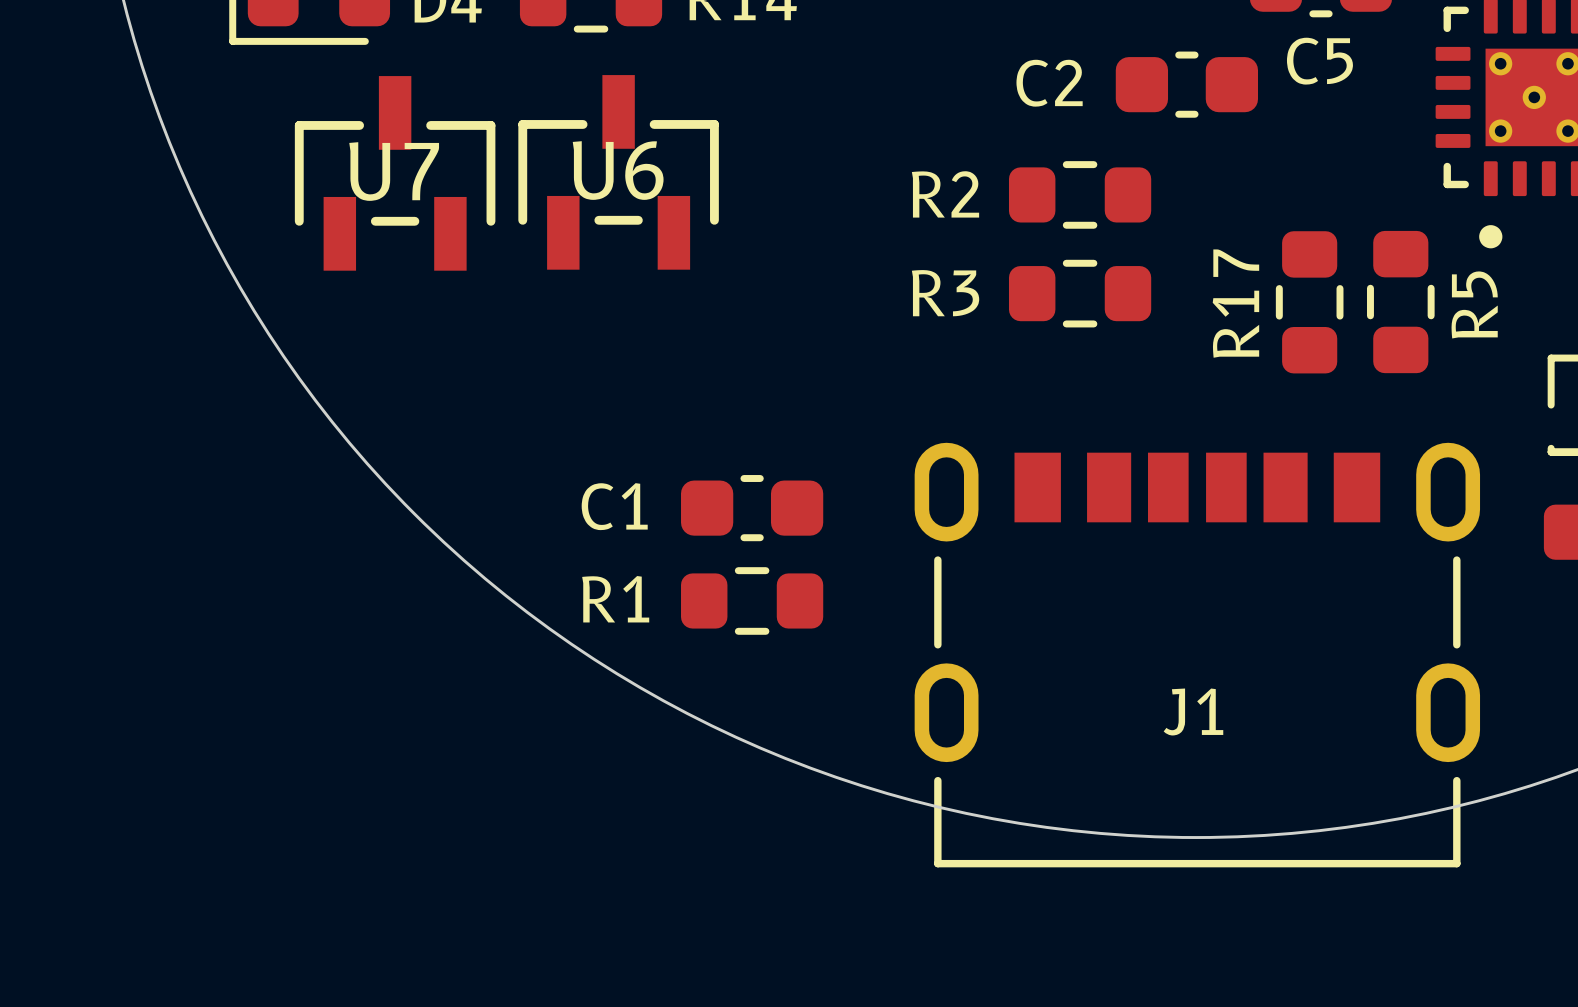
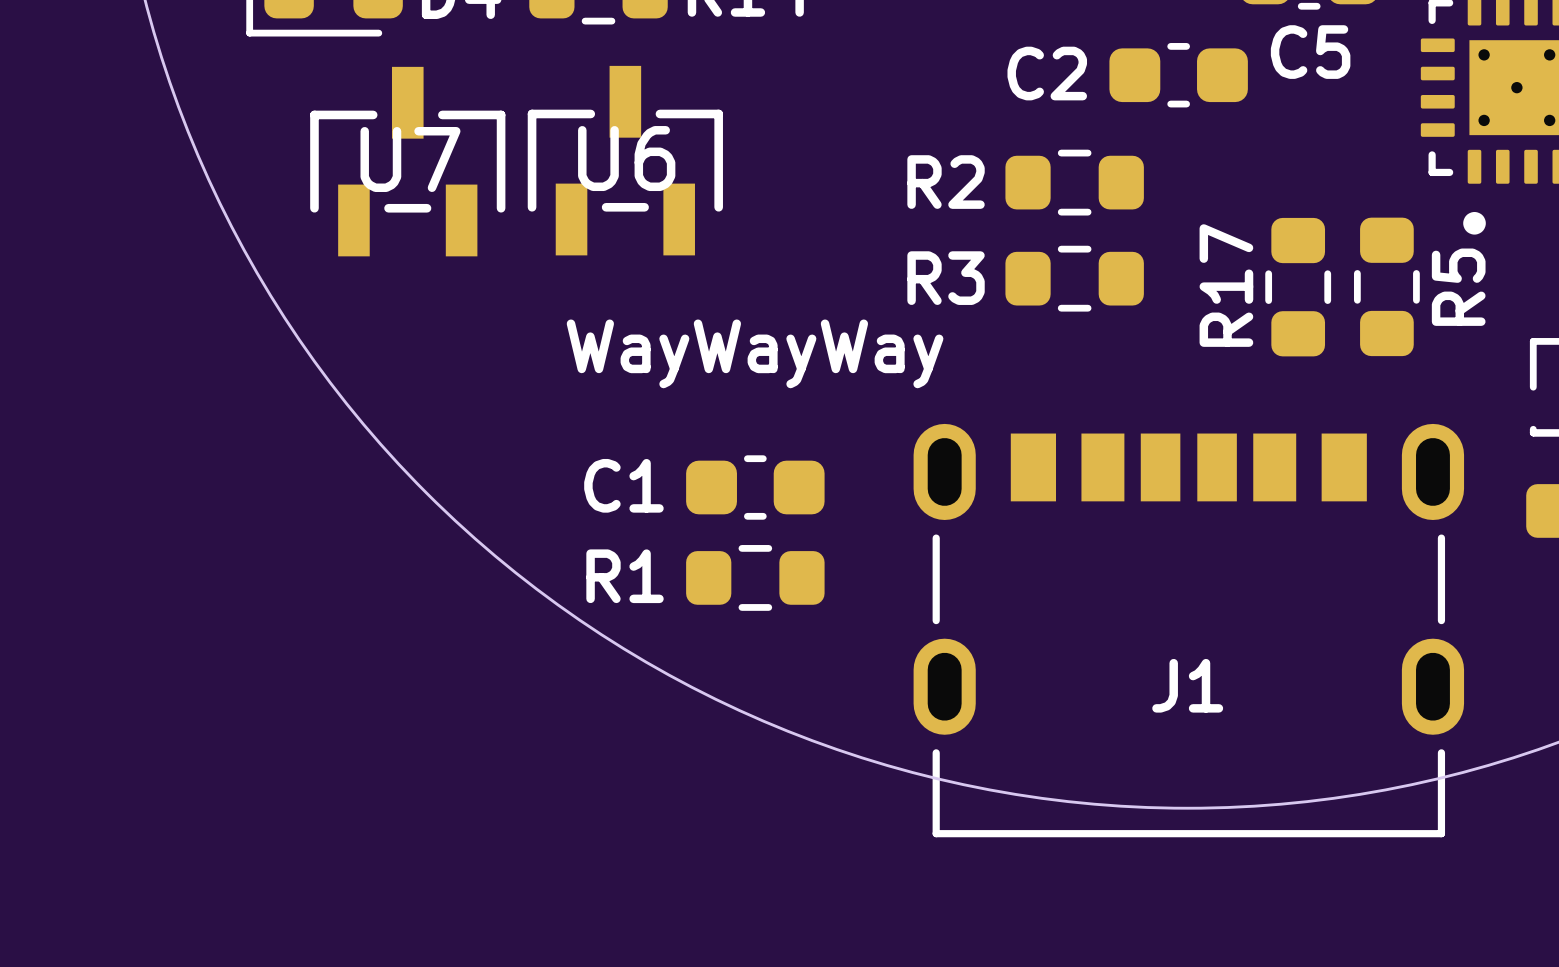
text: none -> WayWayWay (755, 353)

